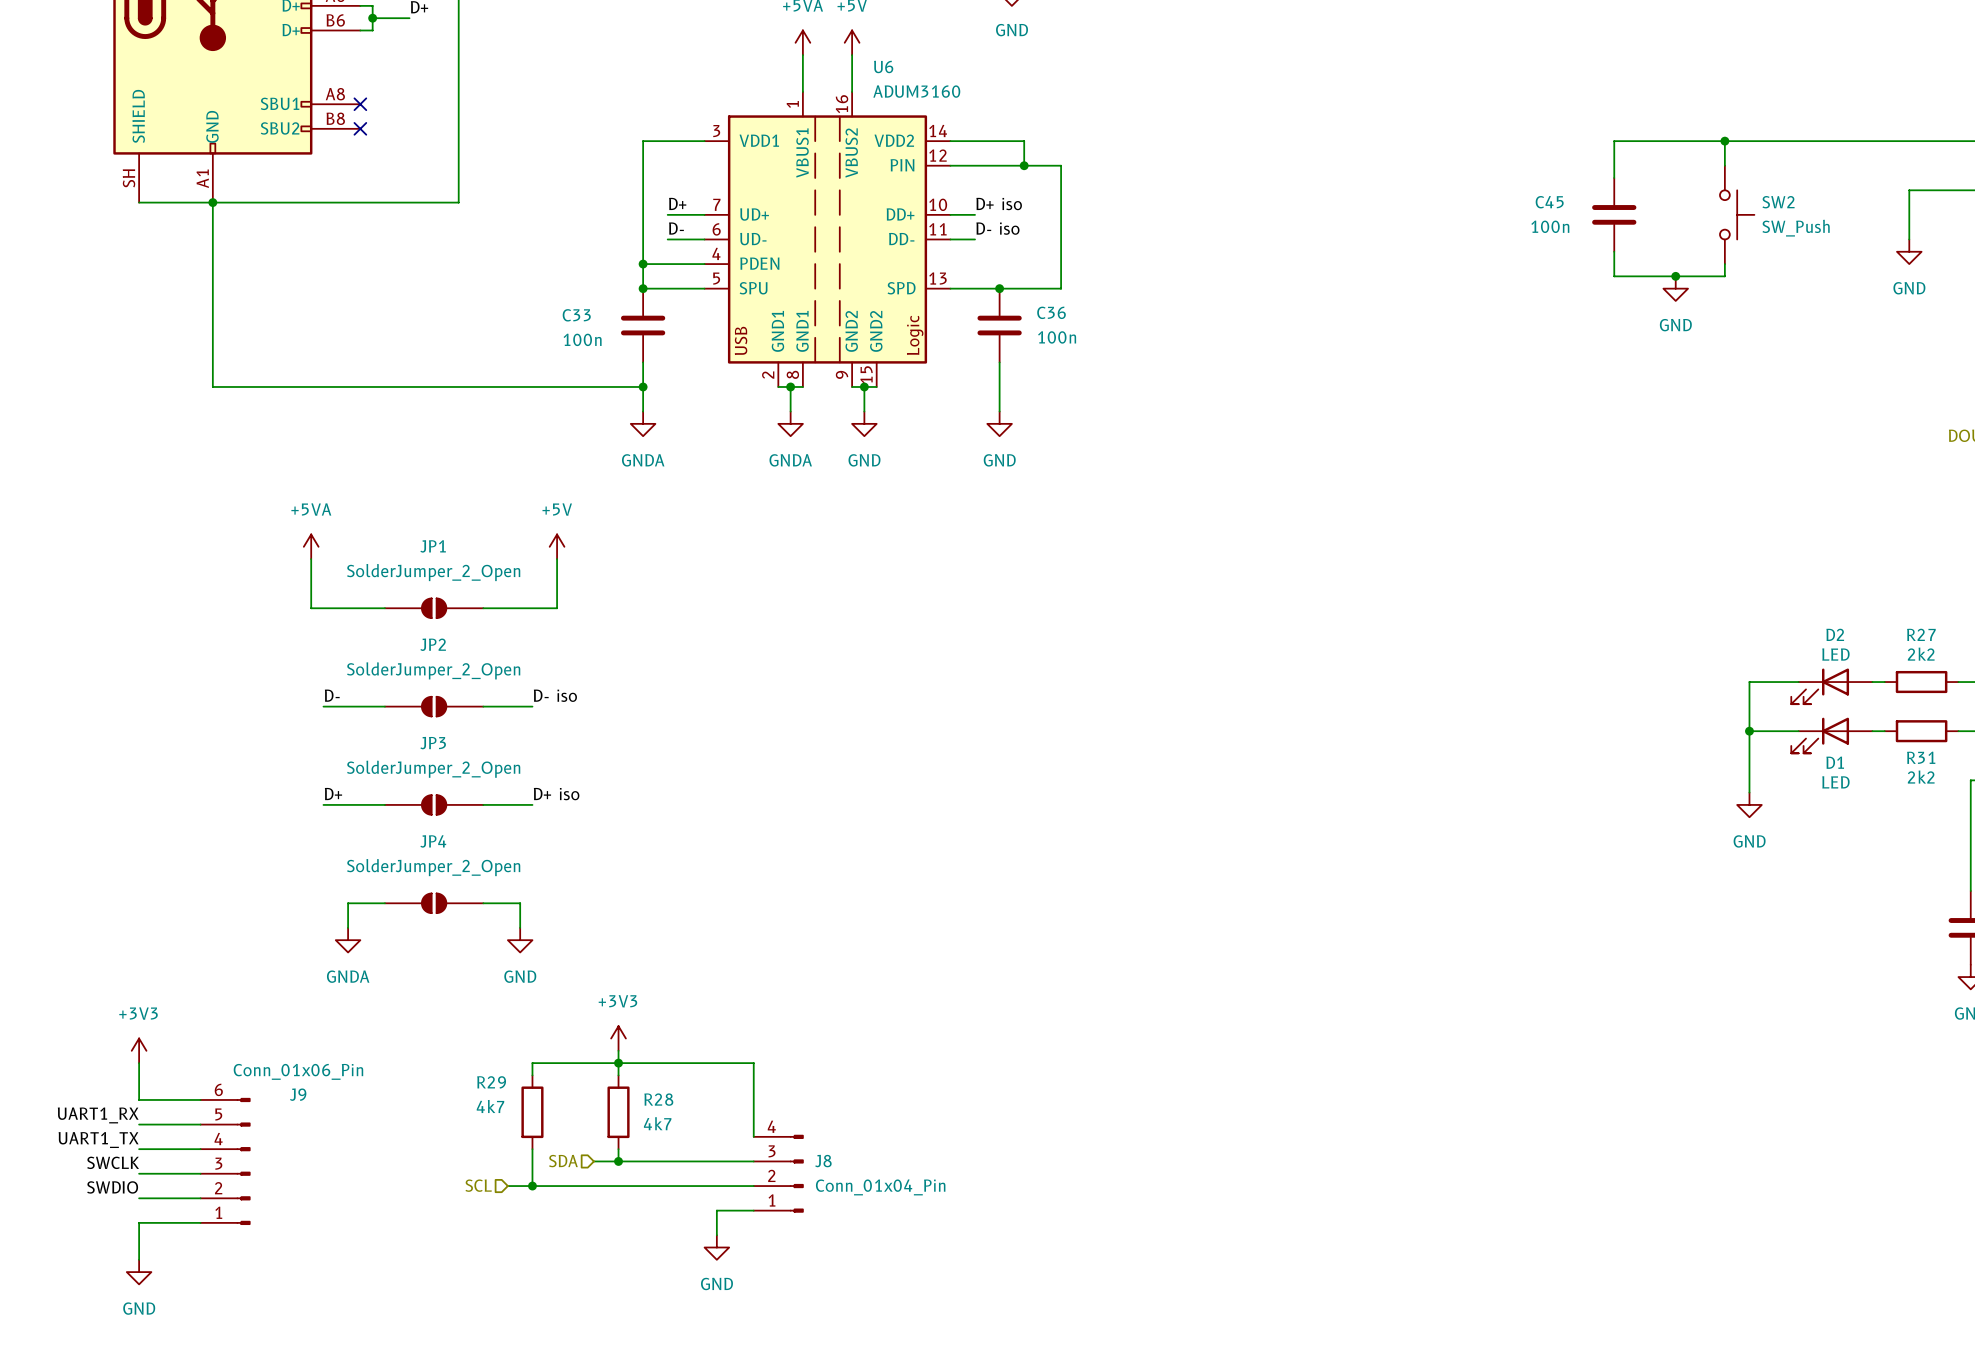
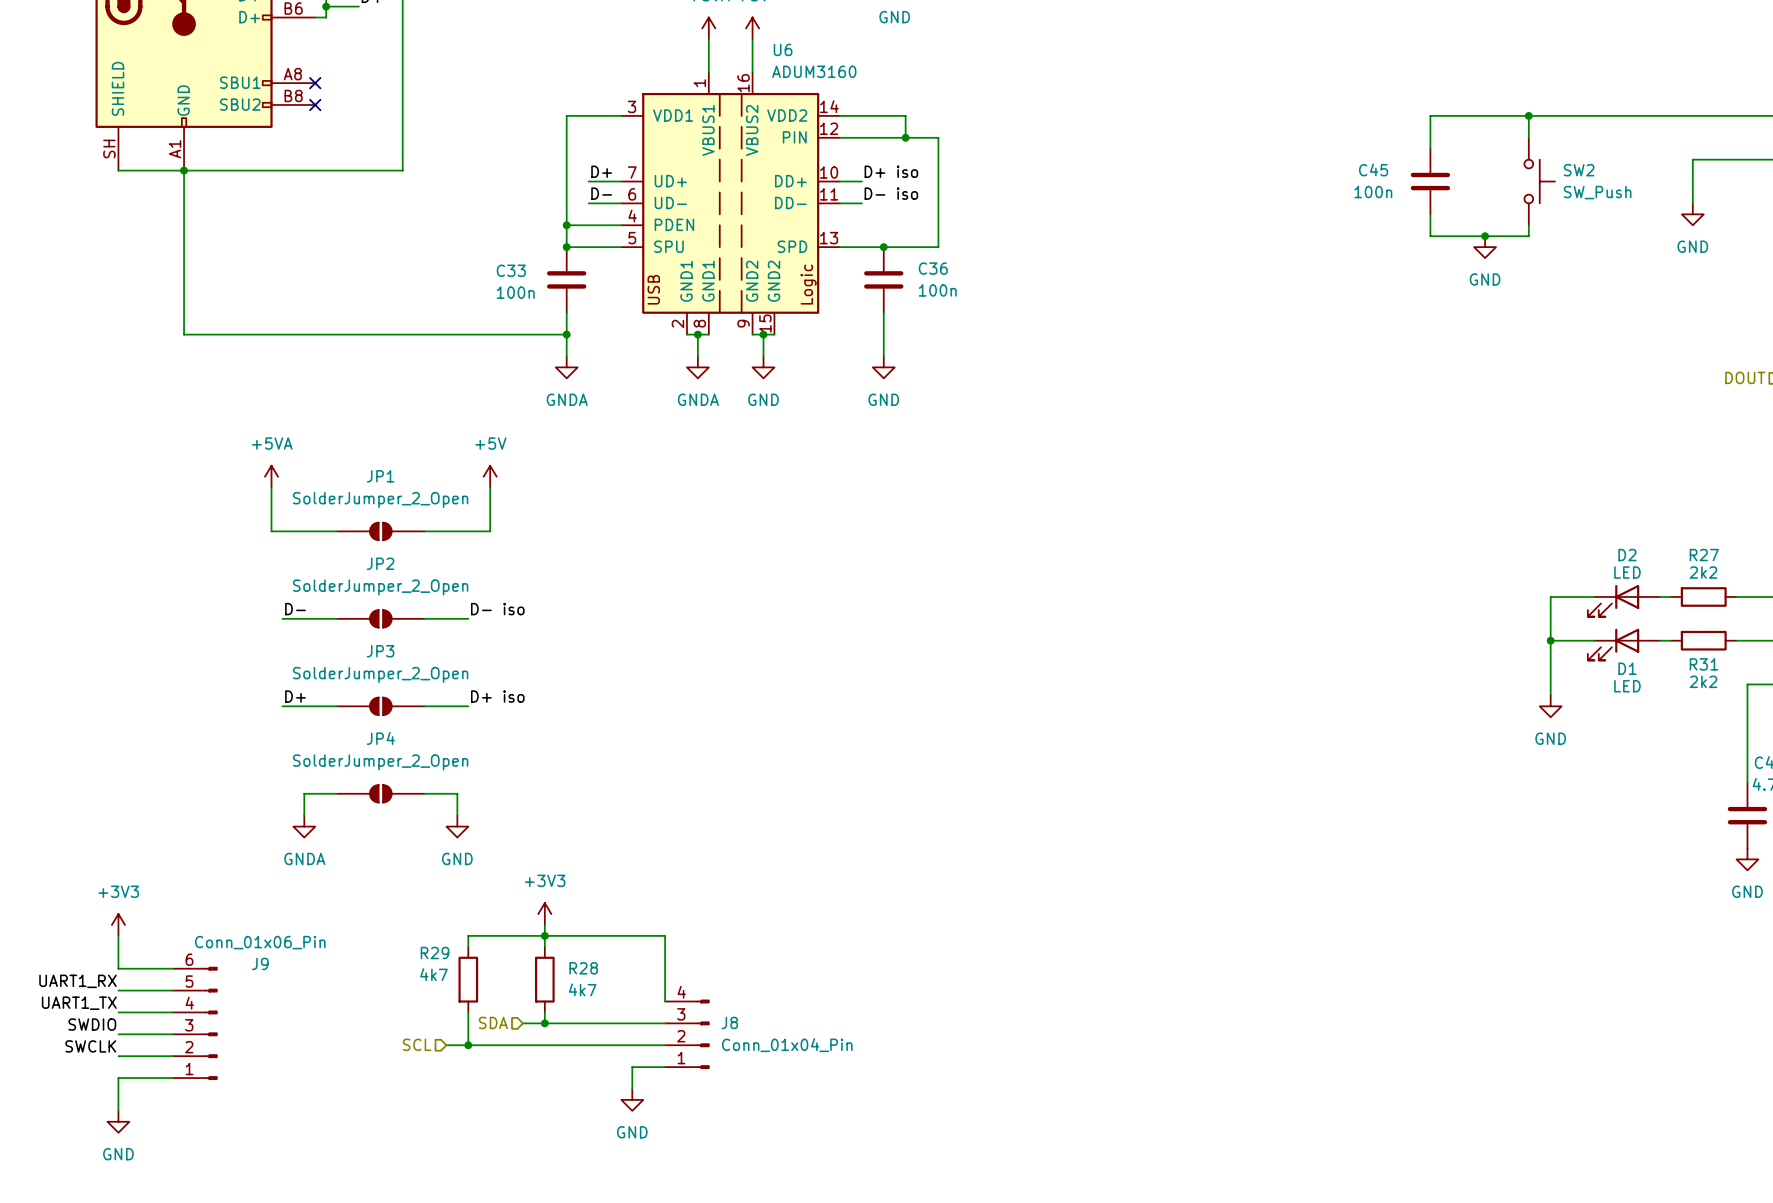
label: SWCLK (113, 1162) -> SWDIO (92, 1024)
label: SWDIO (112, 1187) -> SWCLK (90, 1046)

